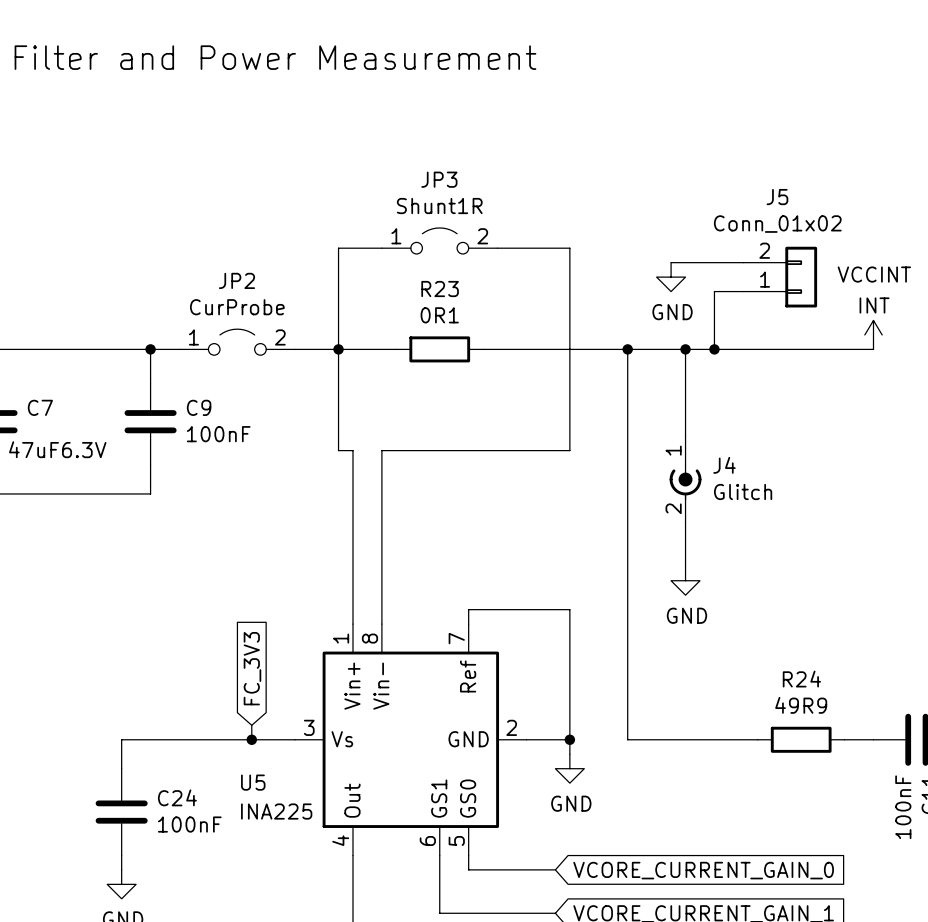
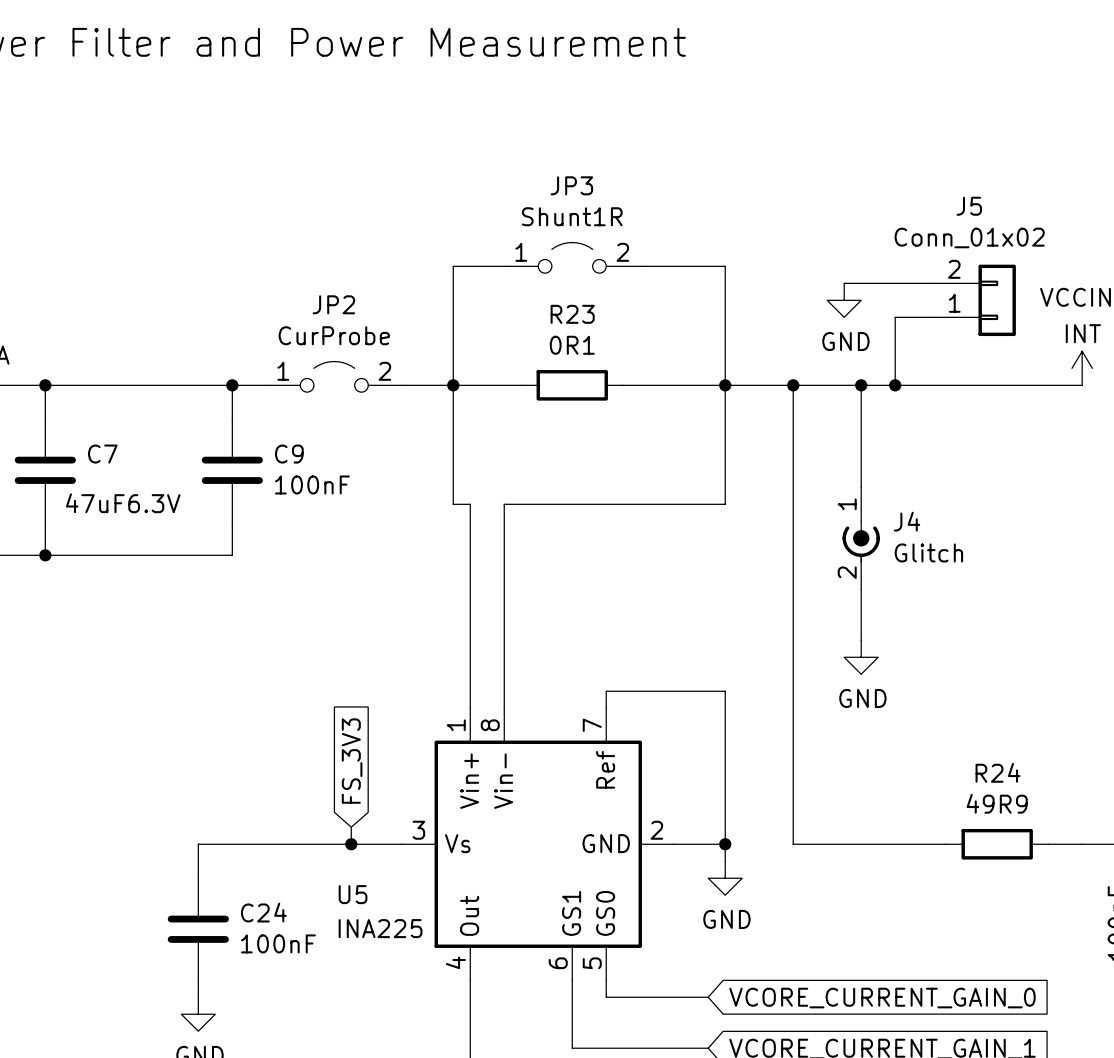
junction: none -> (725, 385)
global label: FC_3V3 (252, 668) -> FS_3V3 (352, 761)

